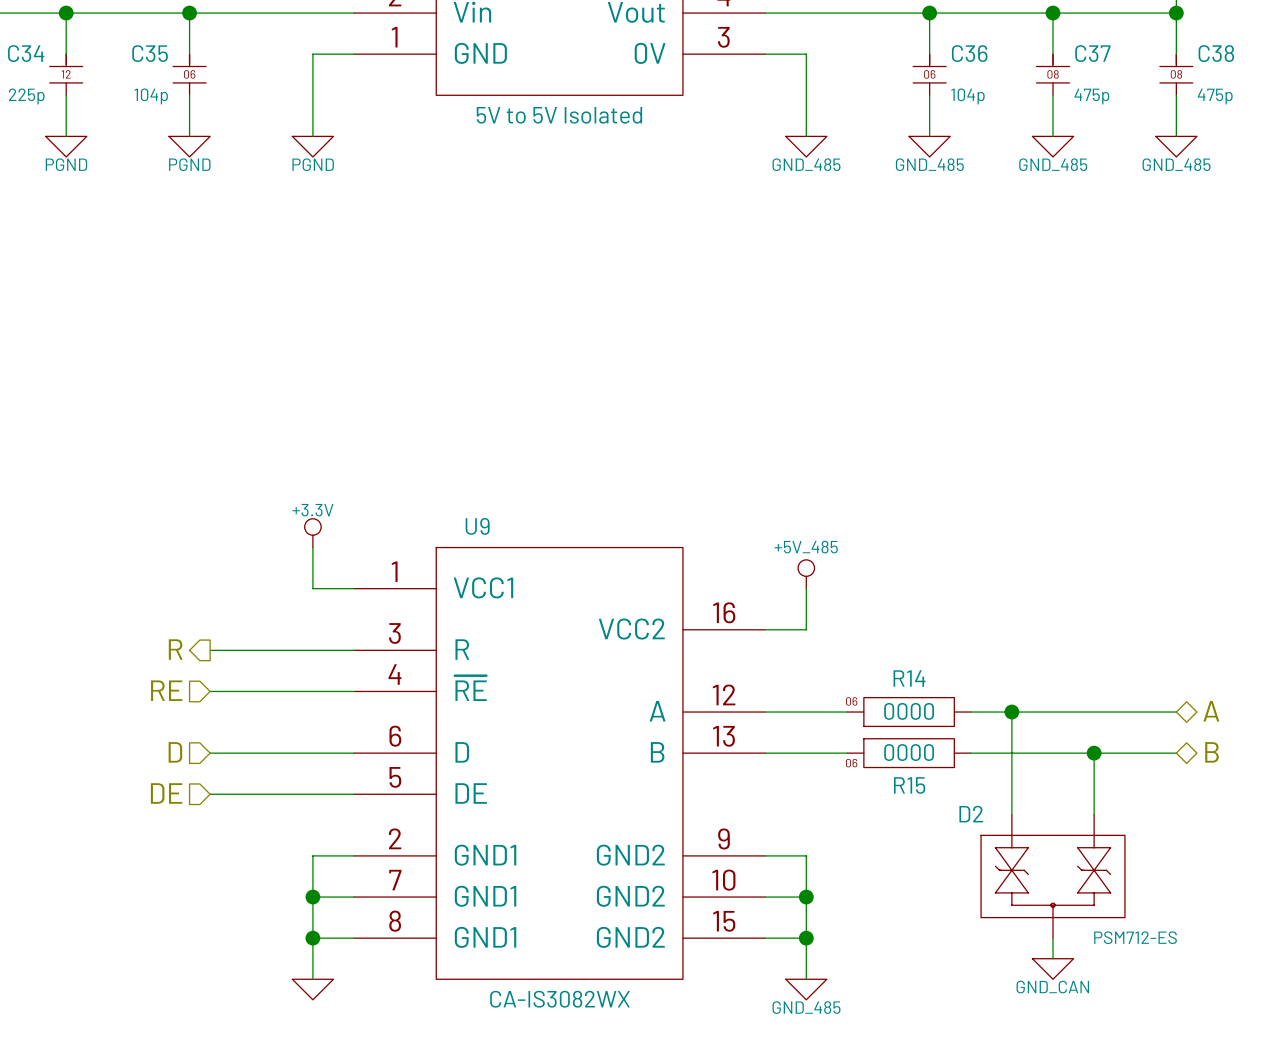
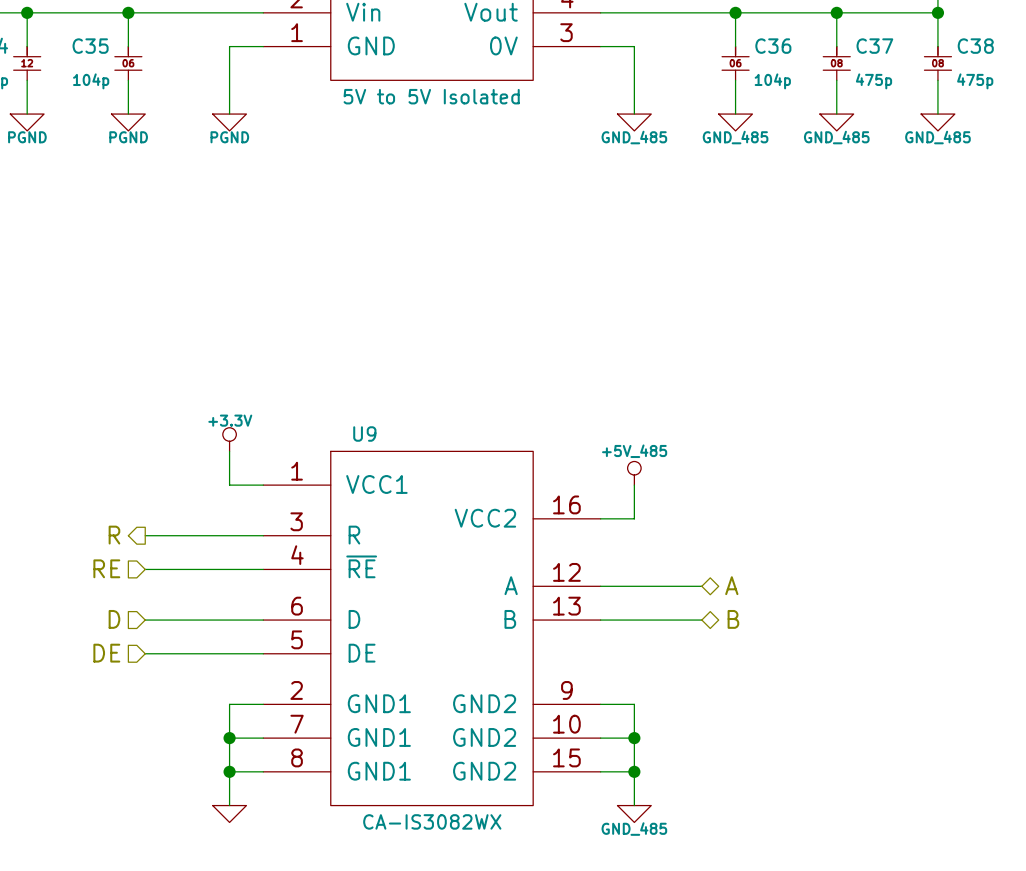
hierarchical label position: A (1211, 711) -> A (731, 585)
wire: none -> (668, 586) (701, 586)
R14: (909, 712) -> none
wire: (970, 712) (1176, 712) -> none
wire: (1011, 712) (1011, 814) -> none
junction: (1011, 712) -> none
hierarchical label position: B (1211, 752) -> B (733, 619)
wire: none -> (668, 620) (701, 620)
R15: (909, 753) -> none
wire: (970, 753) (1176, 753) -> none
wire: (1094, 753) (1094, 814) -> none
junction: (1094, 753) -> none
D2: (1053, 876) -> none
wire: (1053, 938) (1053, 958) -> none
power symbol: GND_CAN (1053, 968) -> none

